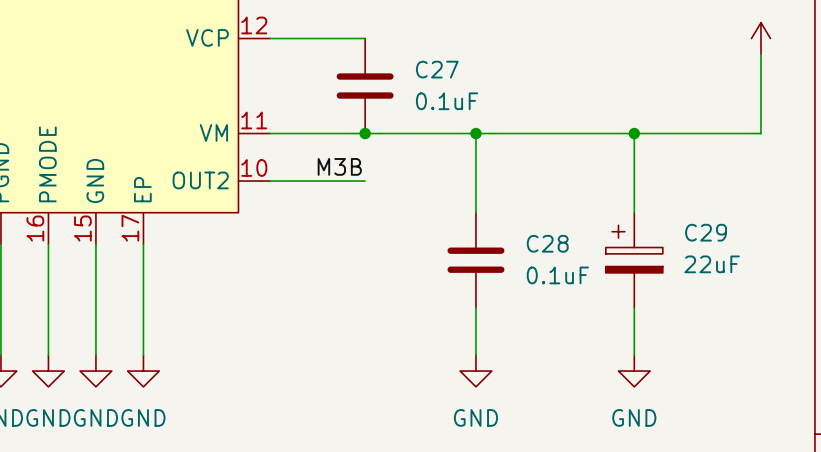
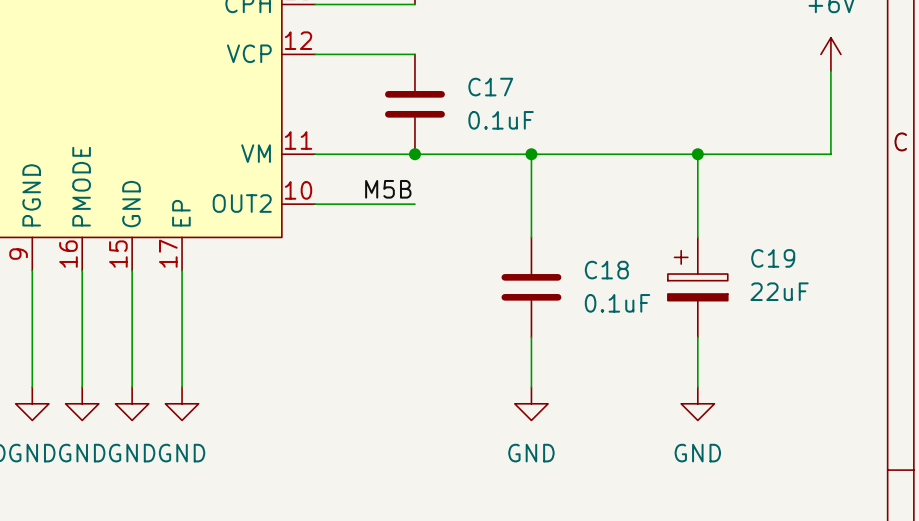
C27 name: C27 (437, 69) -> C17 (490, 87)
label: M3B (339, 166) -> M5B (388, 189)
C29 name: C29 (706, 232) -> C19 (773, 258)
C28 name: C28 (547, 243) -> C18 (606, 270)

